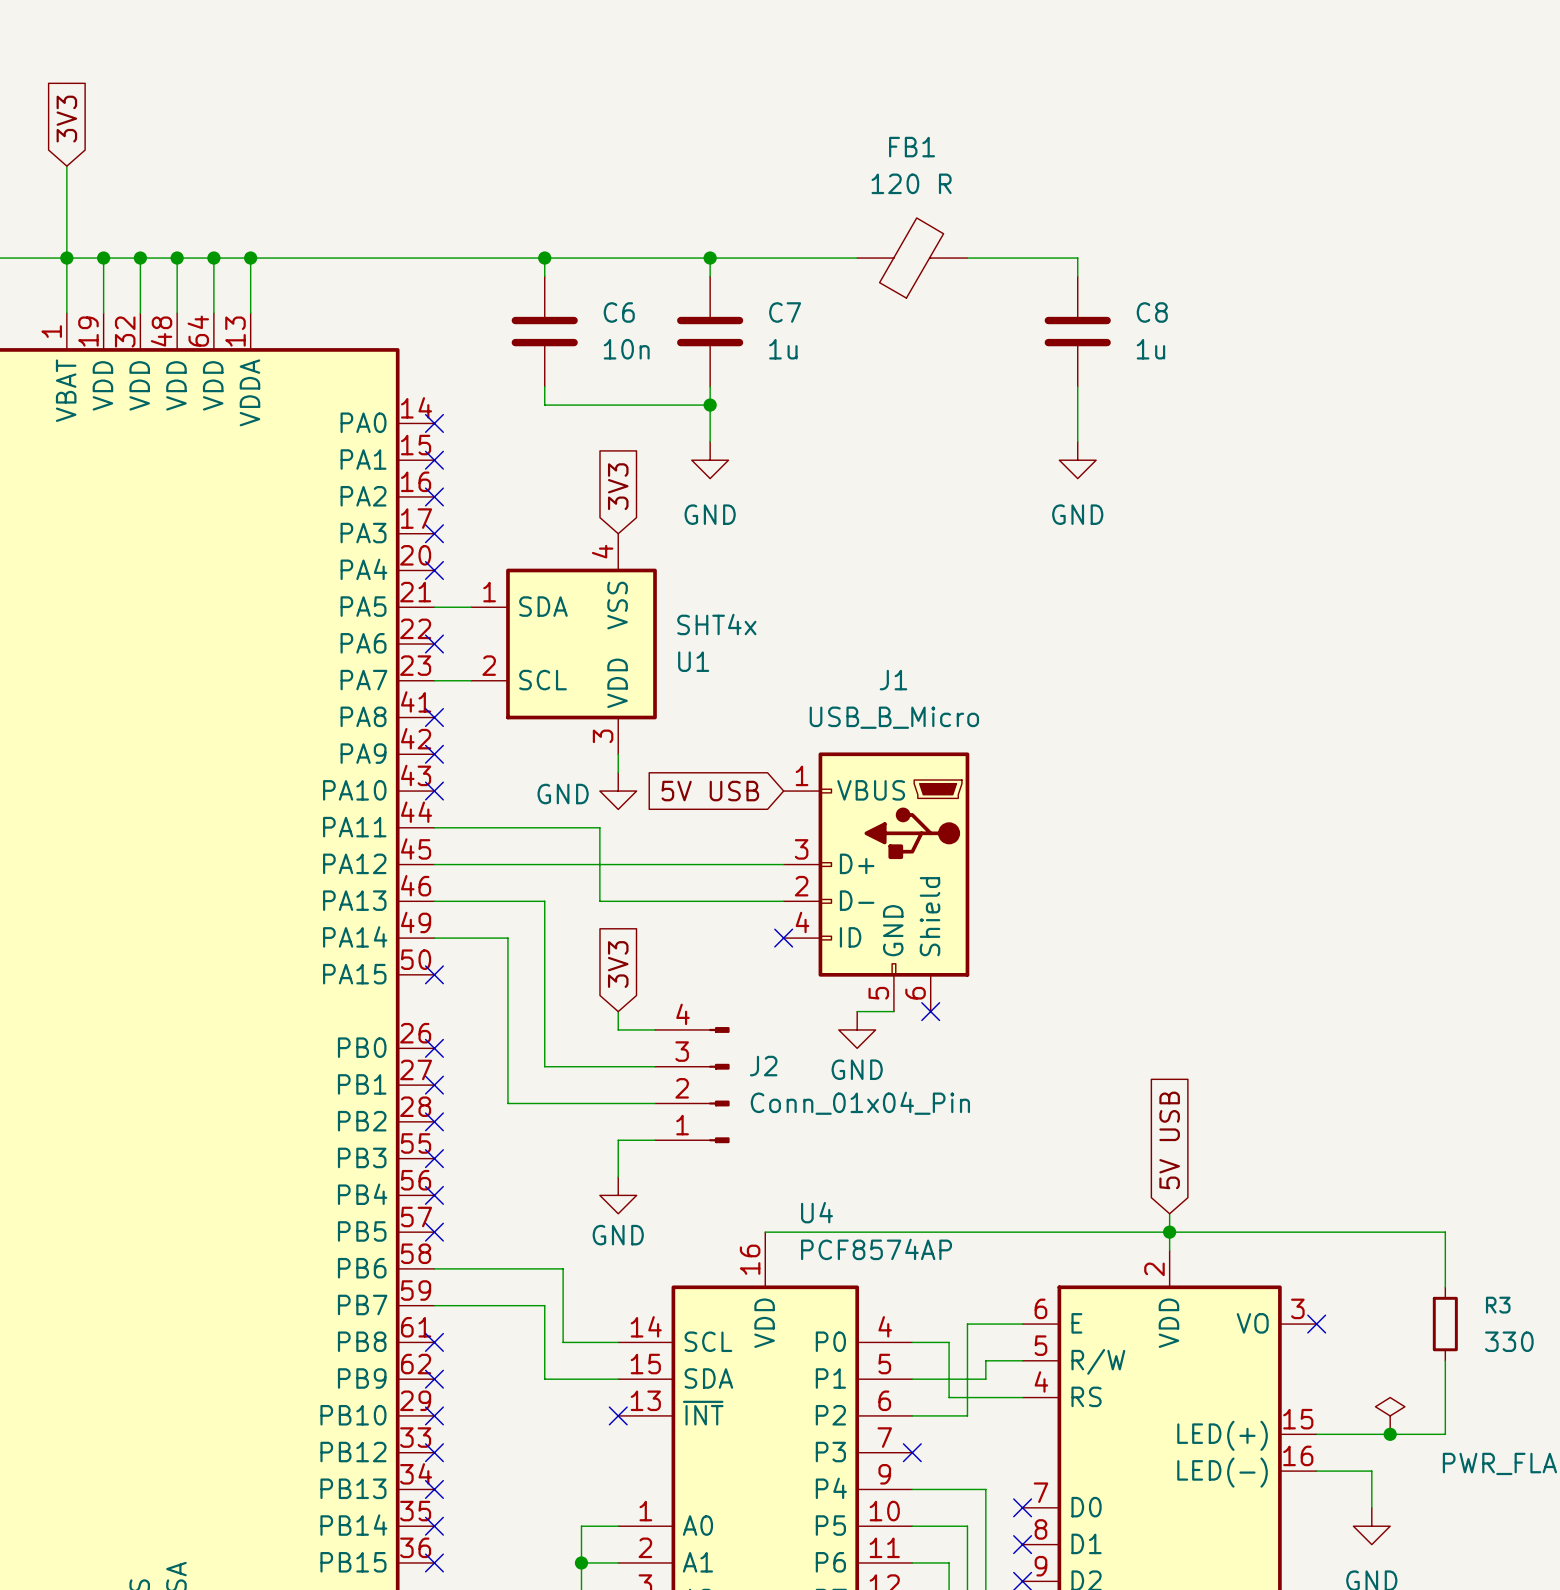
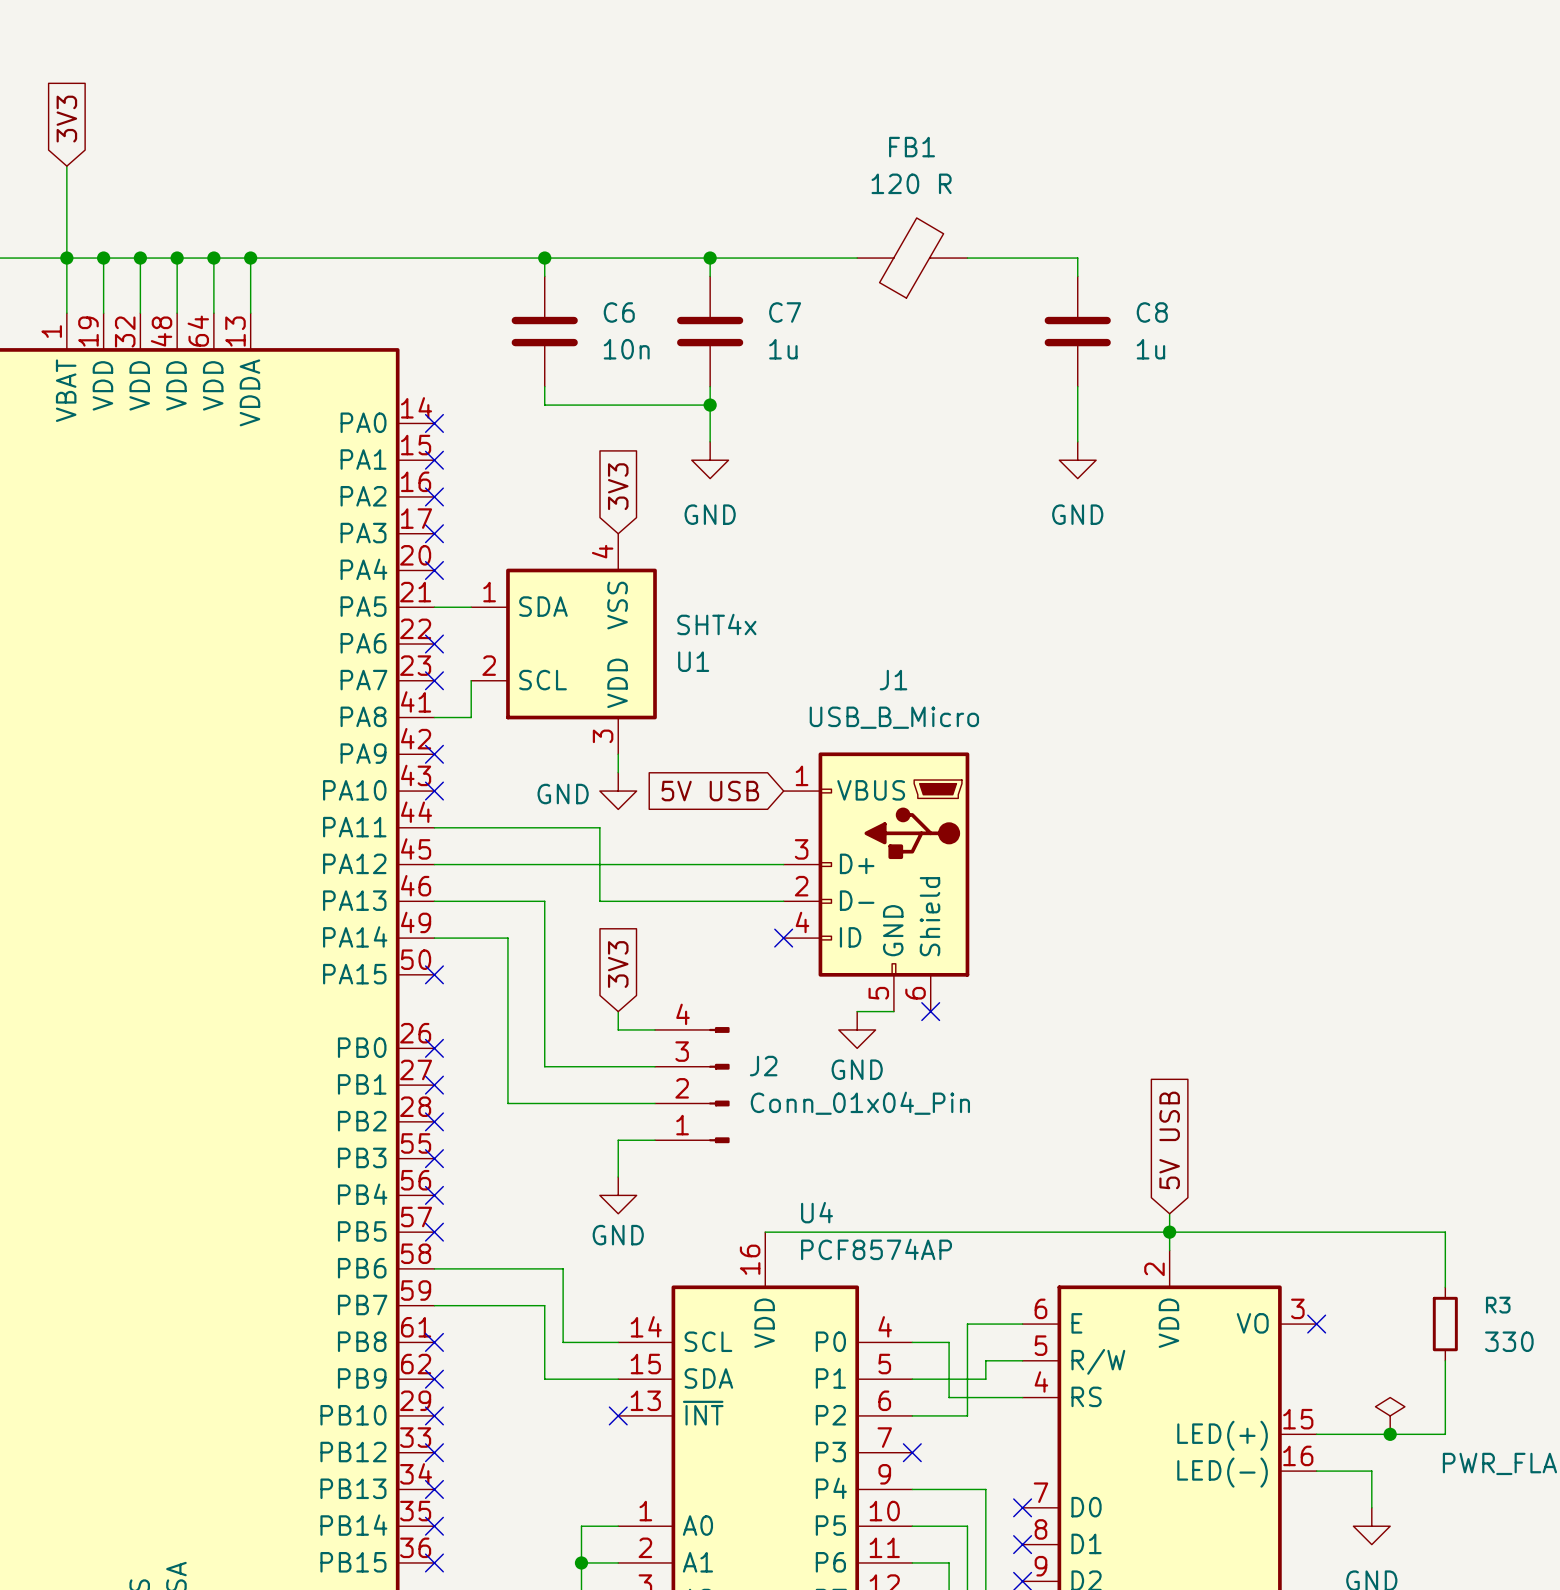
wire: (434, 680) (471, 680) -> (434, 717) (471, 717) (471, 680)
no-connect mark position: (434, 717) -> (434, 680)

